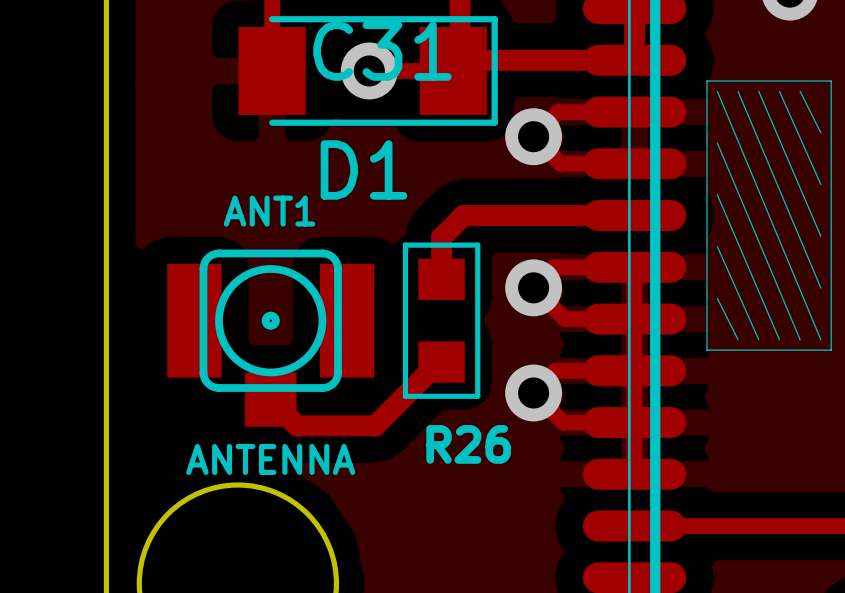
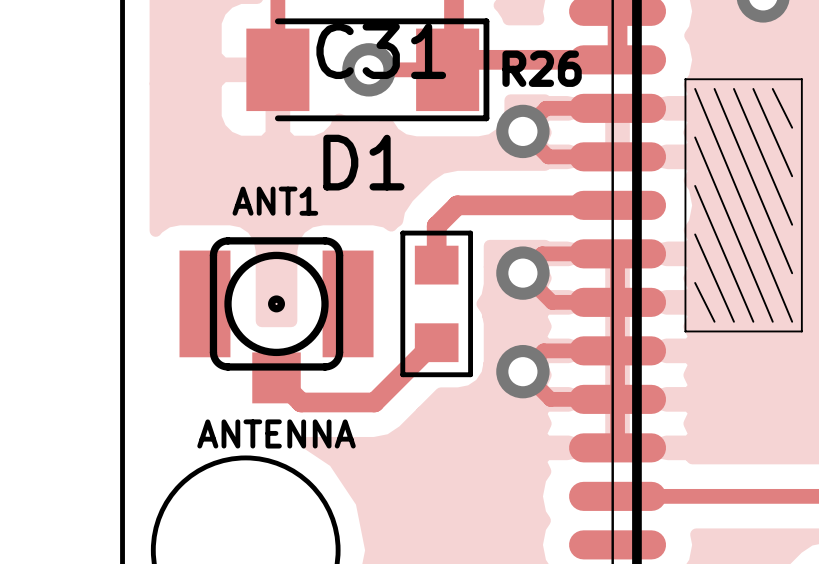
R26 name position: R26 (468, 444) -> R26 (542, 68)

